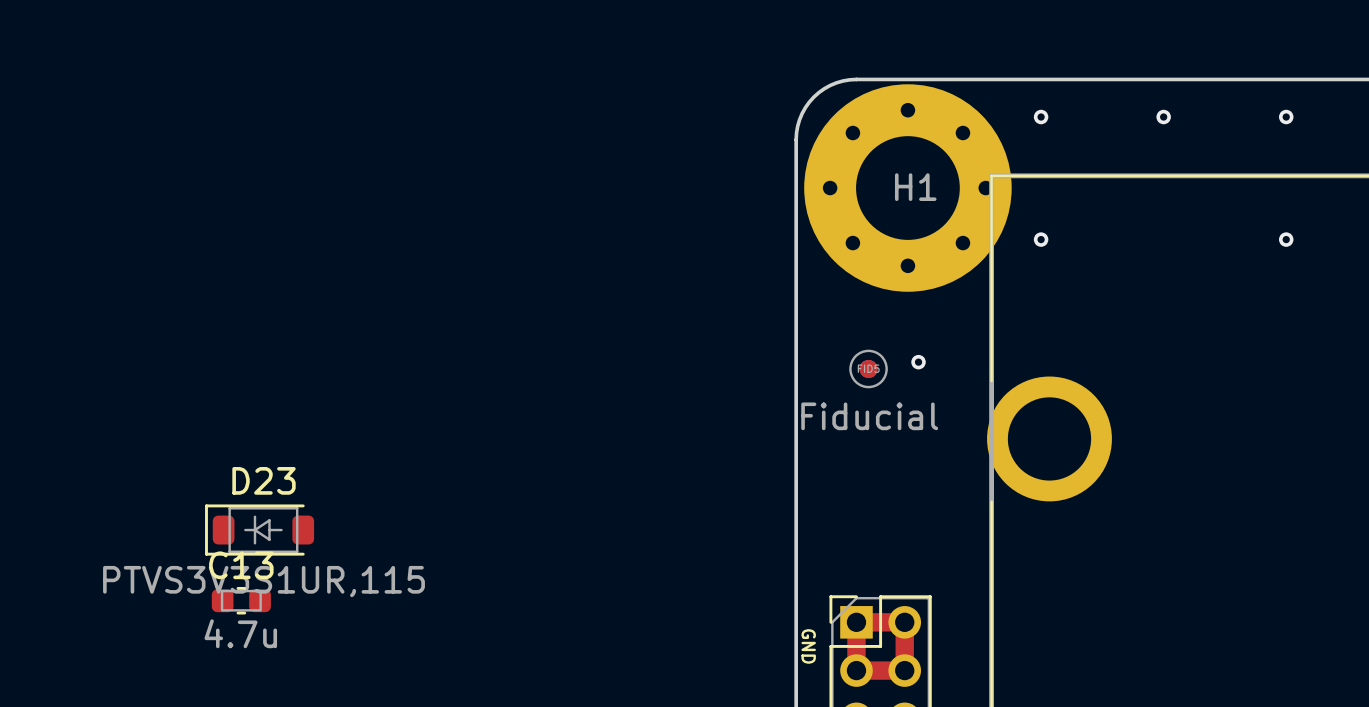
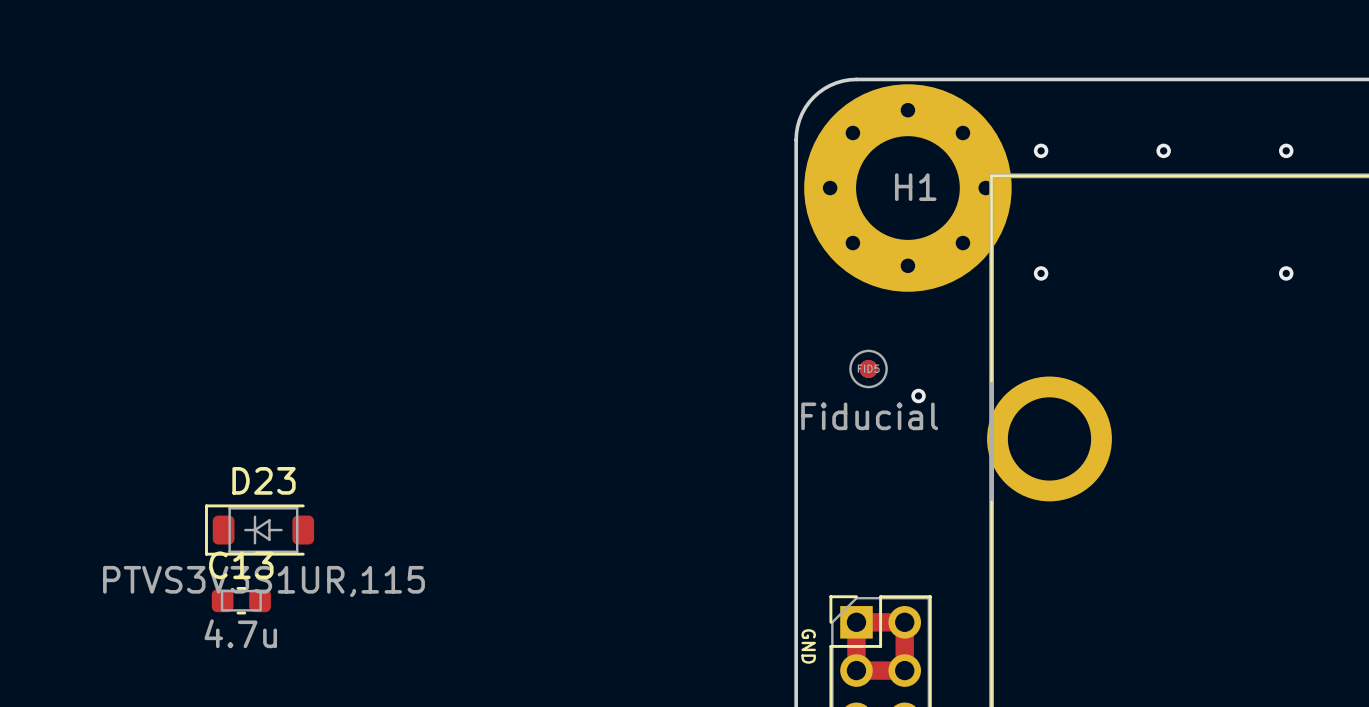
via position: (1041, 117) -> (1041, 150)
via position: (1163, 117) -> (1163, 150)
via position: (1286, 117) -> (1286, 150)
via position: (1041, 239) -> (1041, 273)
via position: (1286, 239) -> (1286, 273)
via position: (918, 362) -> (918, 396)

